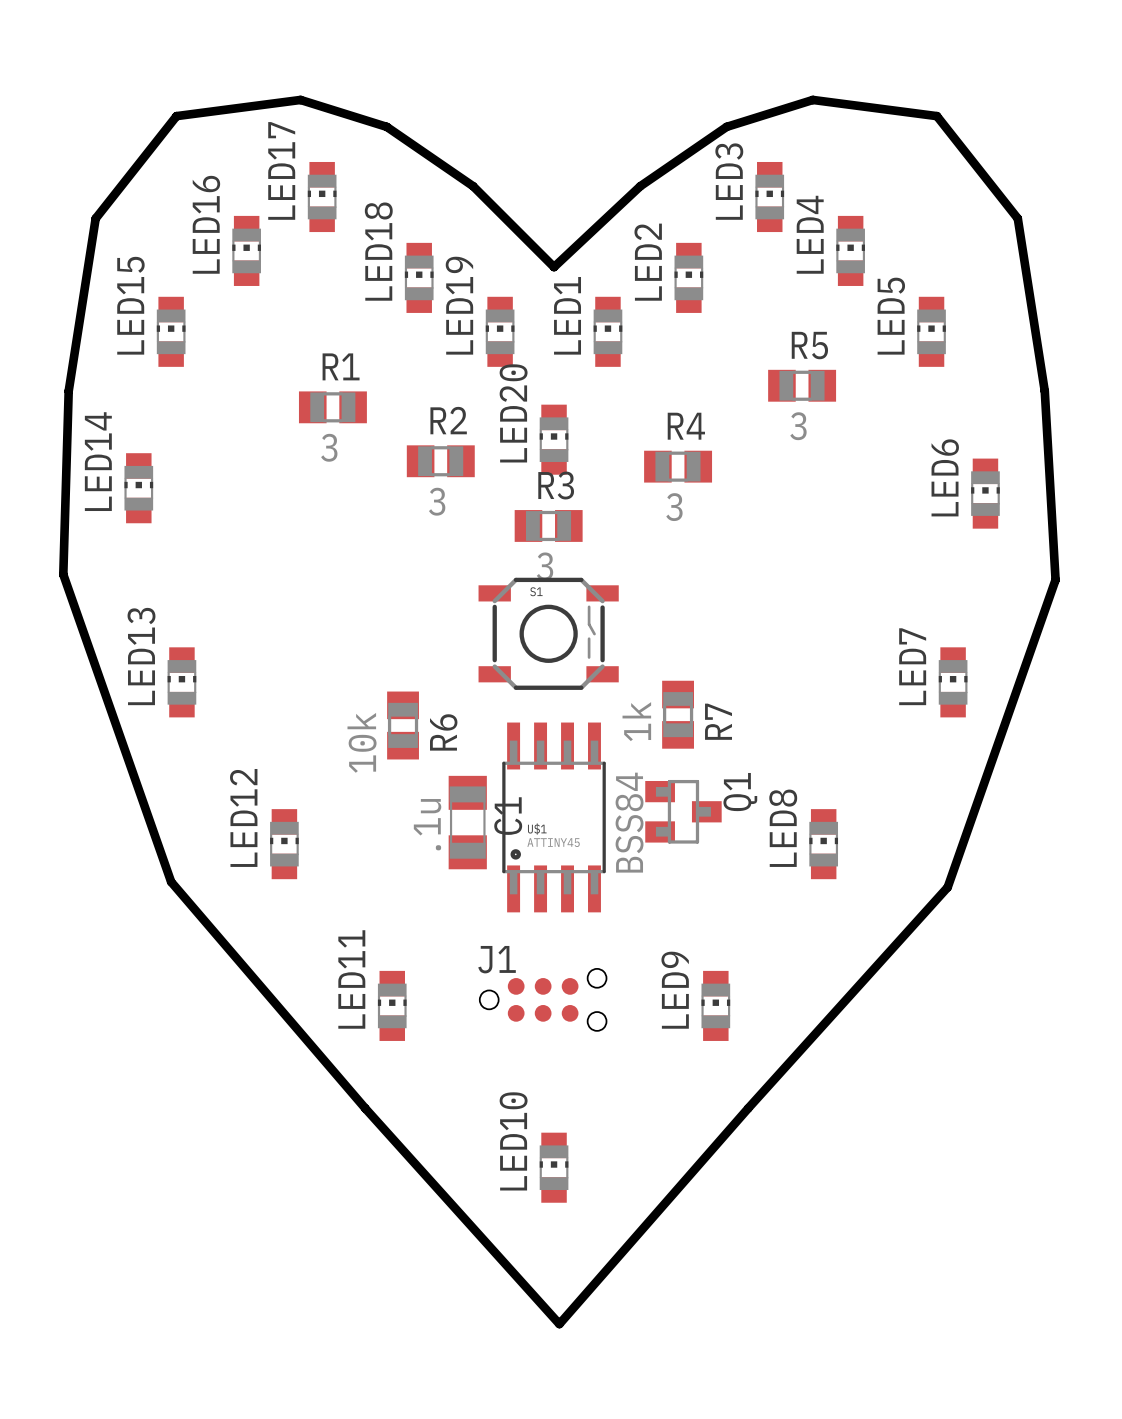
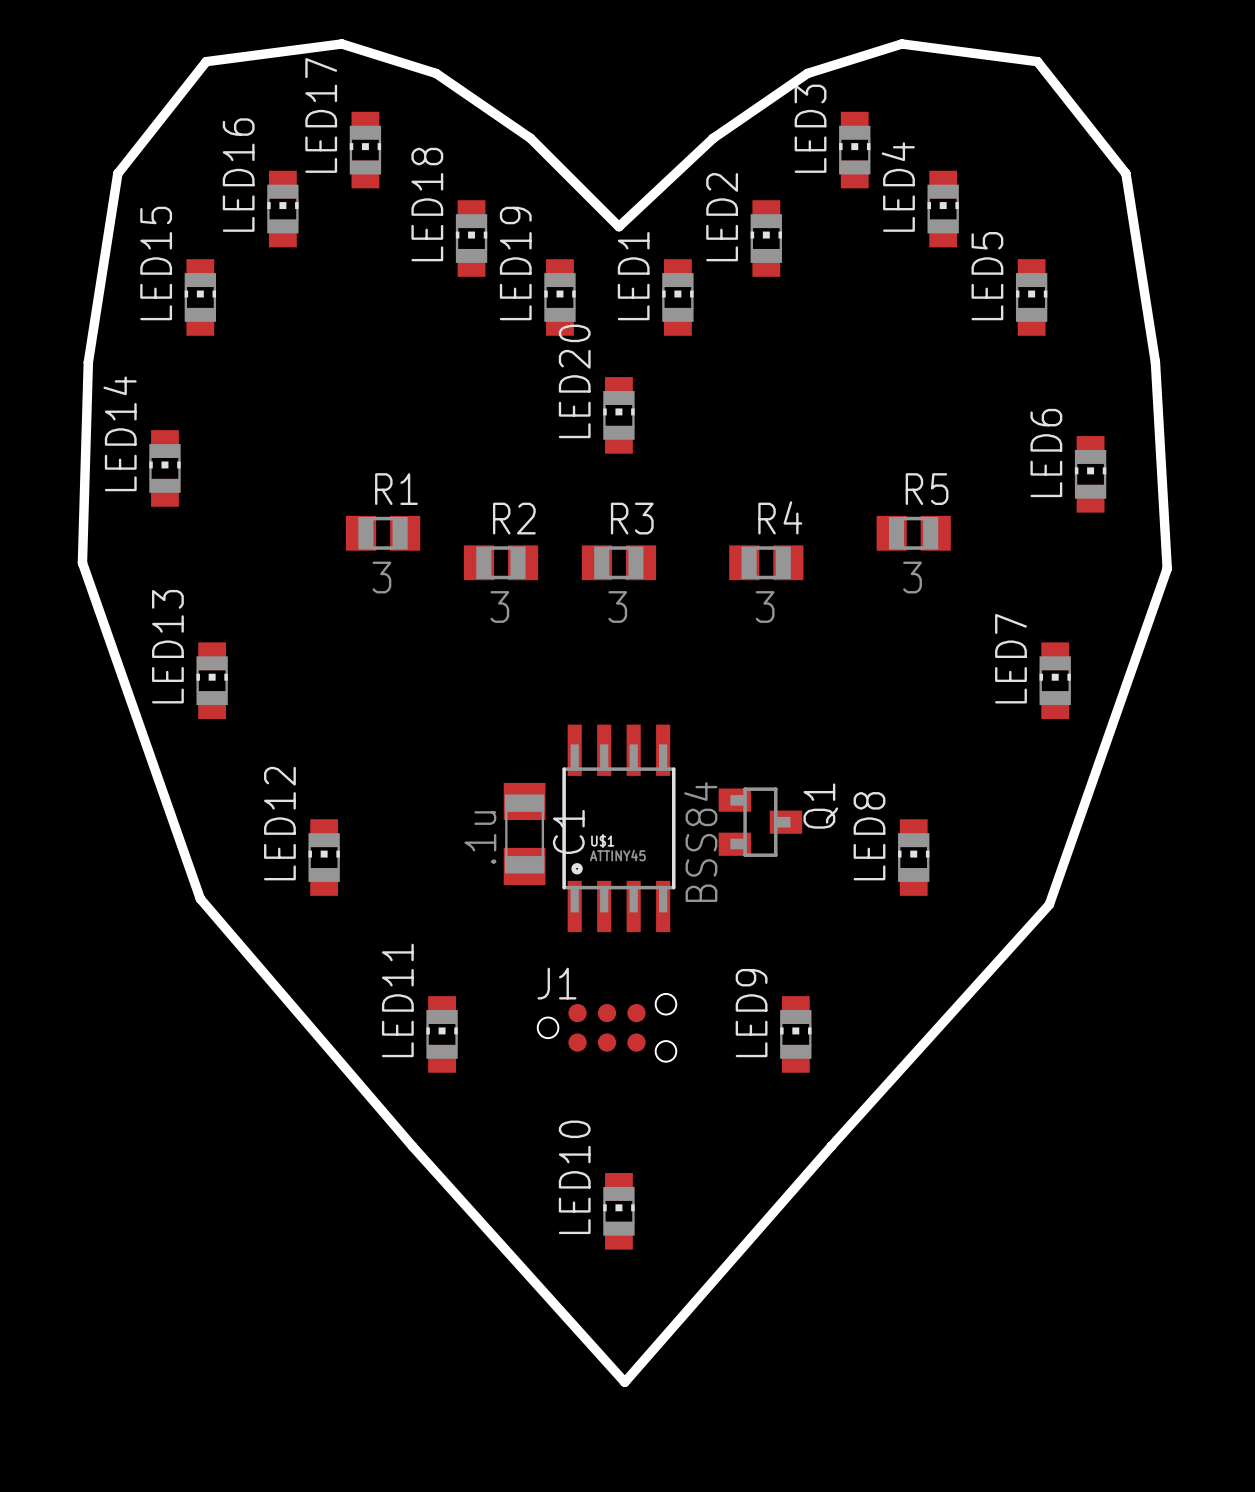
R5 position: (802, 385) -> (913, 533)
R1 position: (332, 407) -> (383, 533)
R2 position: (440, 461) -> (501, 562)
R4 position: (678, 466) -> (766, 562)
R3 position: (548, 525) -> (618, 562)
S1: (548, 633) -> none
R7: 1k (678, 714) -> none
R6: 10k (403, 725) -> none

